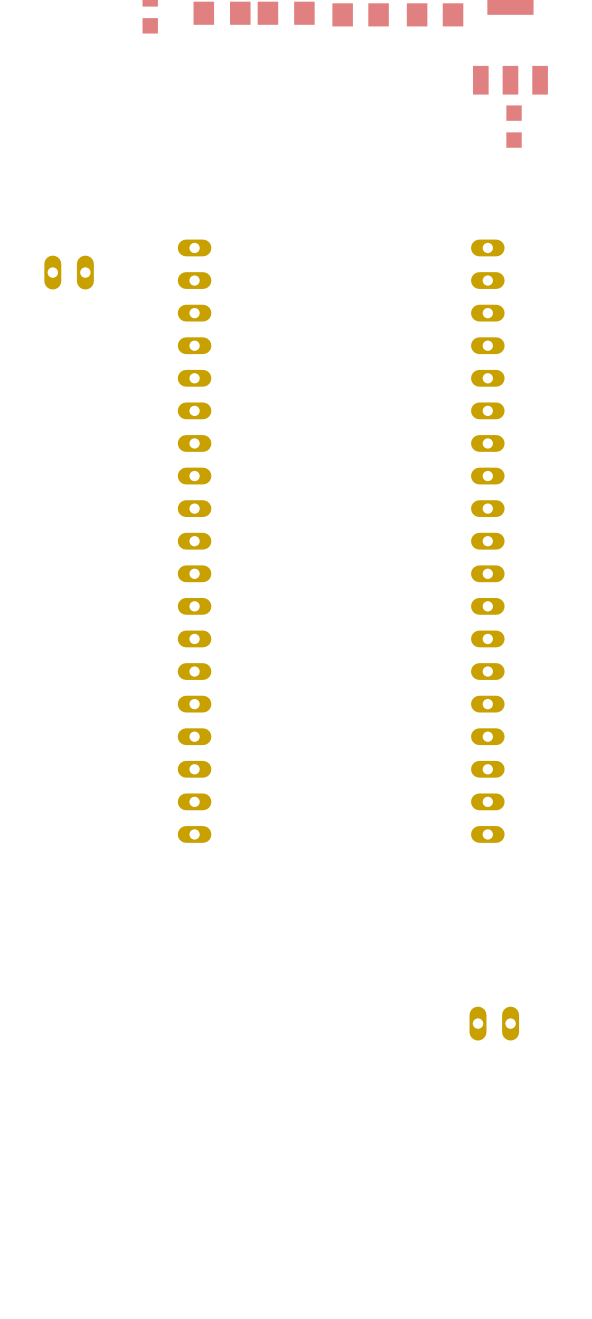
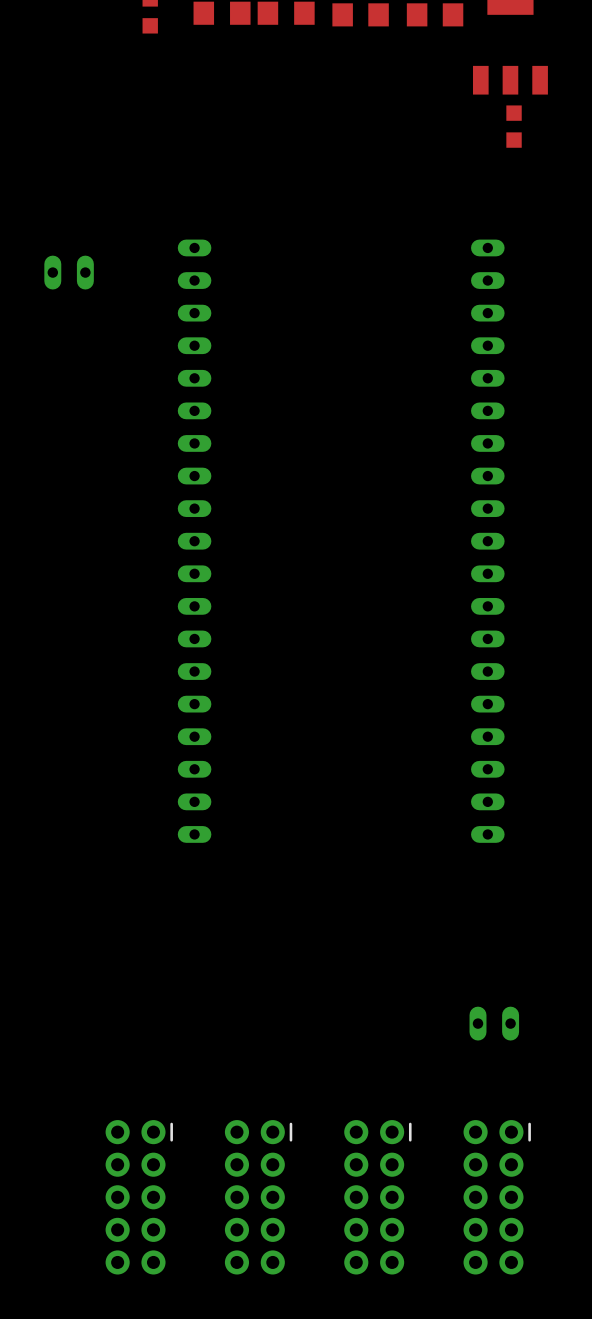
part: none -> (139, 1197)
part: none -> (258, 1197)
part: none -> (377, 1197)
part: none -> (497, 1197)

